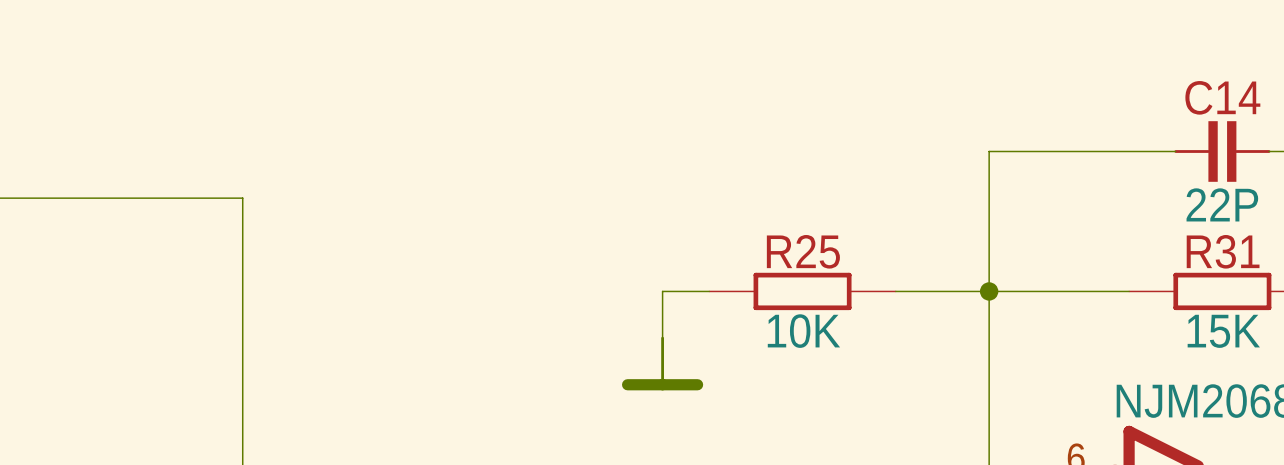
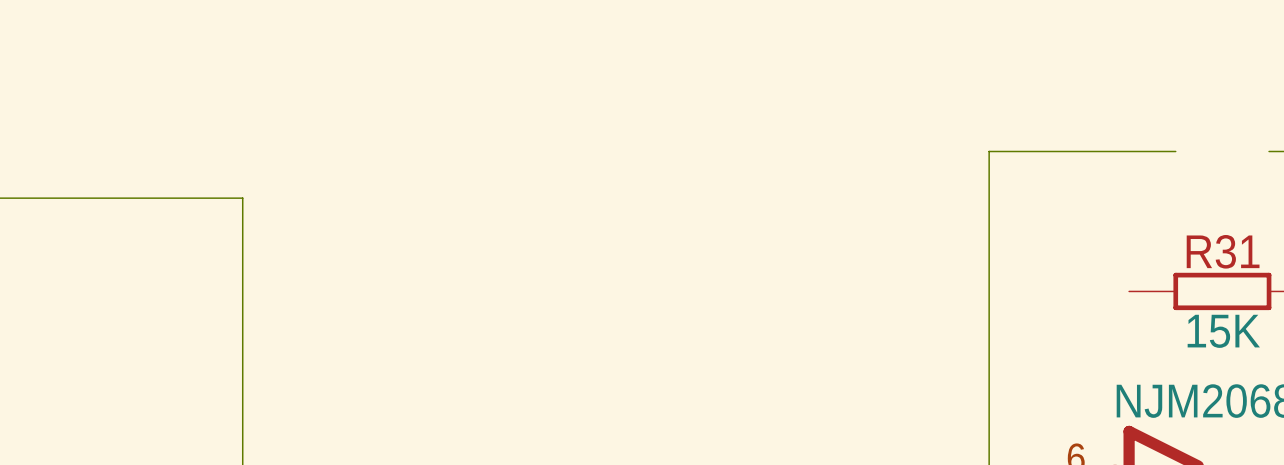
C14: 22P (1222, 151) -> none
wire: (709, 291) (662, 291) (662, 338) -> none
R25: 10K (802, 291) -> none
wire: (895, 291) (1129, 291) -> none
junction: (989, 291) -> none
power symbol: (662, 363) -> none

